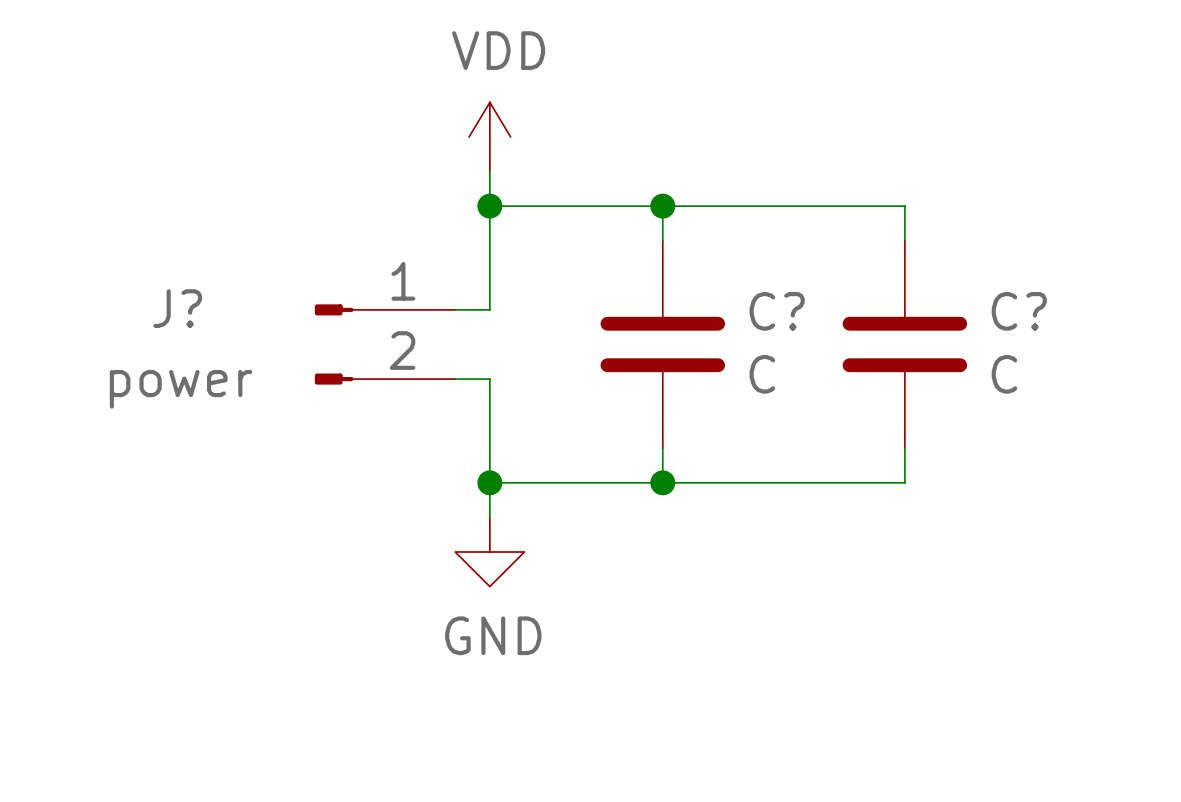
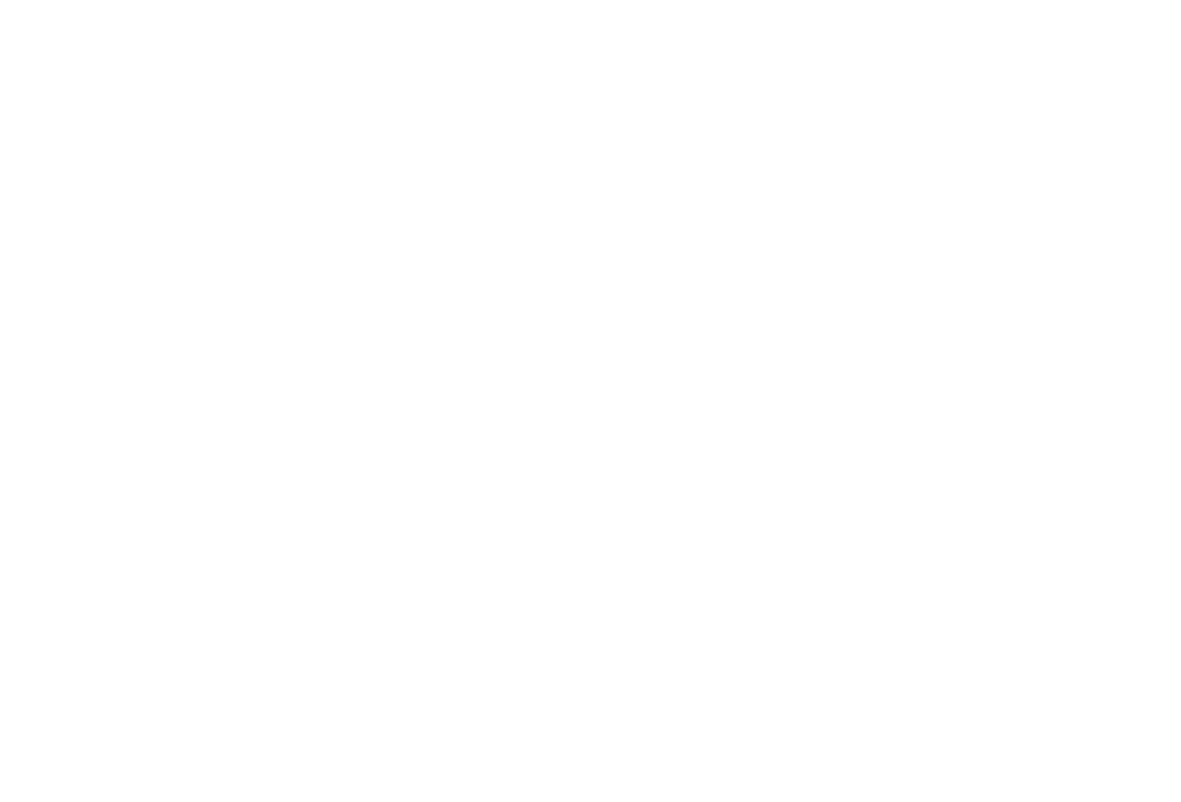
power symbol: VDD (489, 136) -> none
wire: (489, 171) (489, 309) (455, 309) -> none
wire: (489, 206) (904, 206) (904, 240) -> none
junction: (489, 206) -> none
wire: (662, 206) (662, 240) -> none
junction: (662, 206) -> none
J?: power (385, 344) -> none
C?: C (662, 344) -> none
C?: C (904, 344) -> none
wire: (455, 379) (489, 379) (489, 517) -> none
wire: (662, 448) (662, 482) -> none
wire: (904, 448) (904, 482) (489, 482) -> none
junction: (489, 482) -> none
junction: (662, 482) -> none
power symbol: GND (489, 551) -> none

